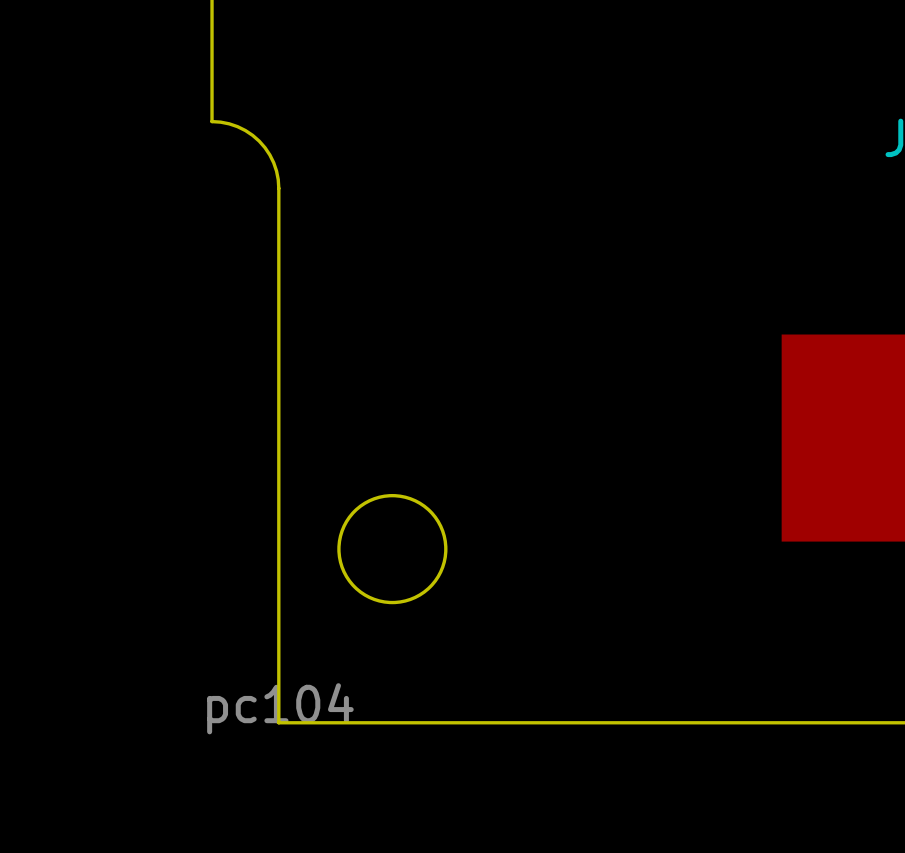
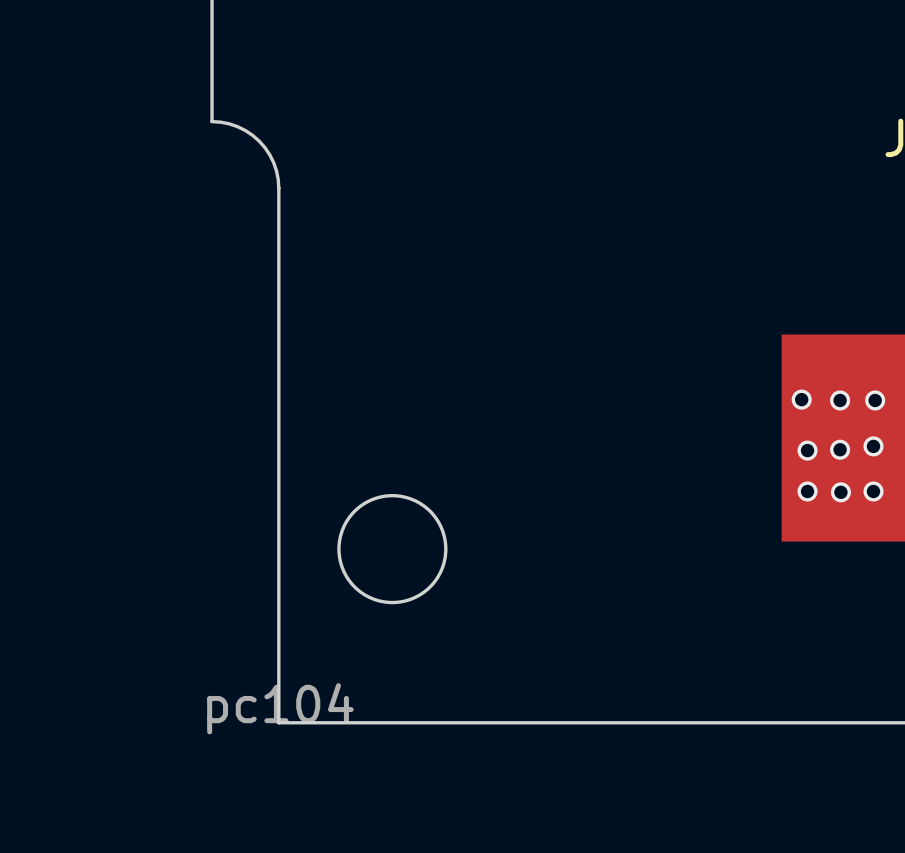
via: none -> (801, 399)
via: none -> (840, 400)
via: none -> (875, 400)
via: none -> (873, 446)
via: none -> (840, 449)
via: none -> (807, 450)
via: none -> (807, 491)
via: none -> (873, 491)
via: none -> (840, 492)

